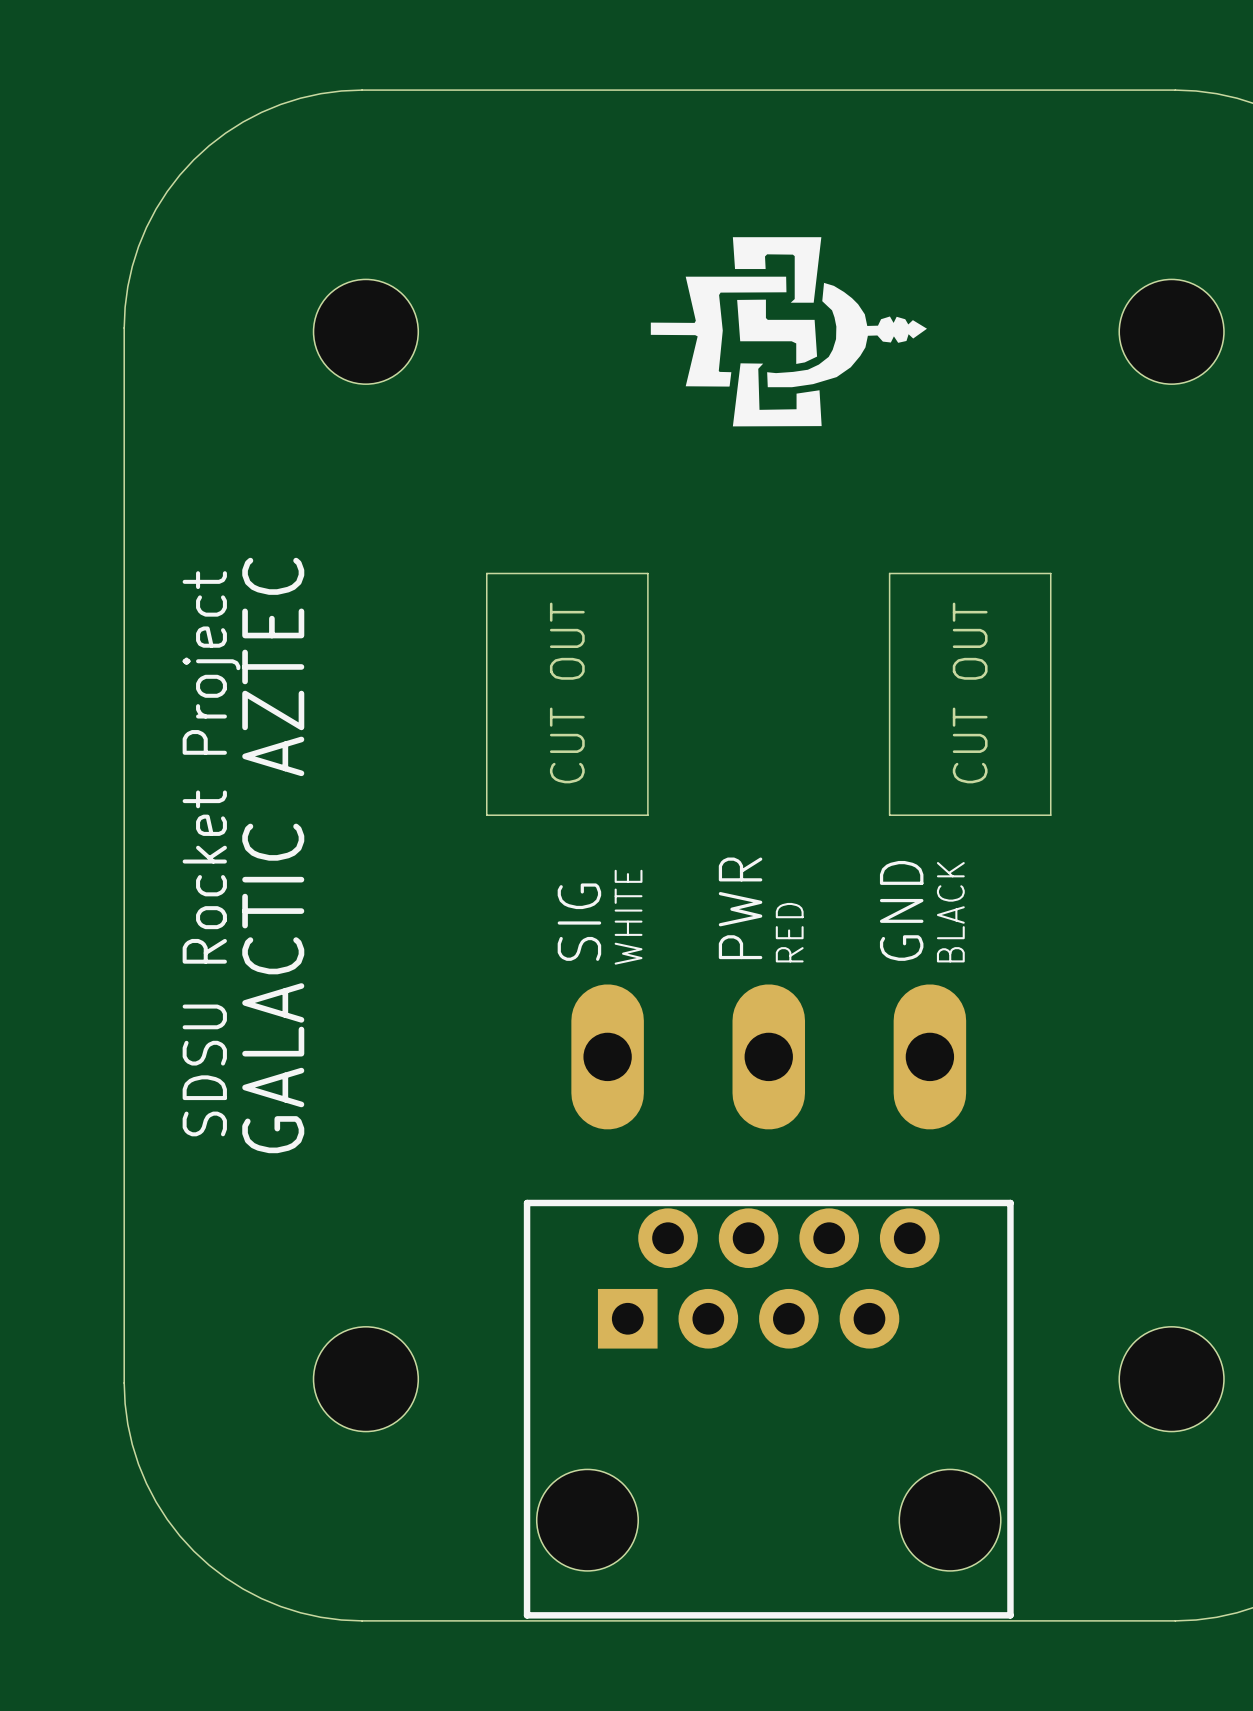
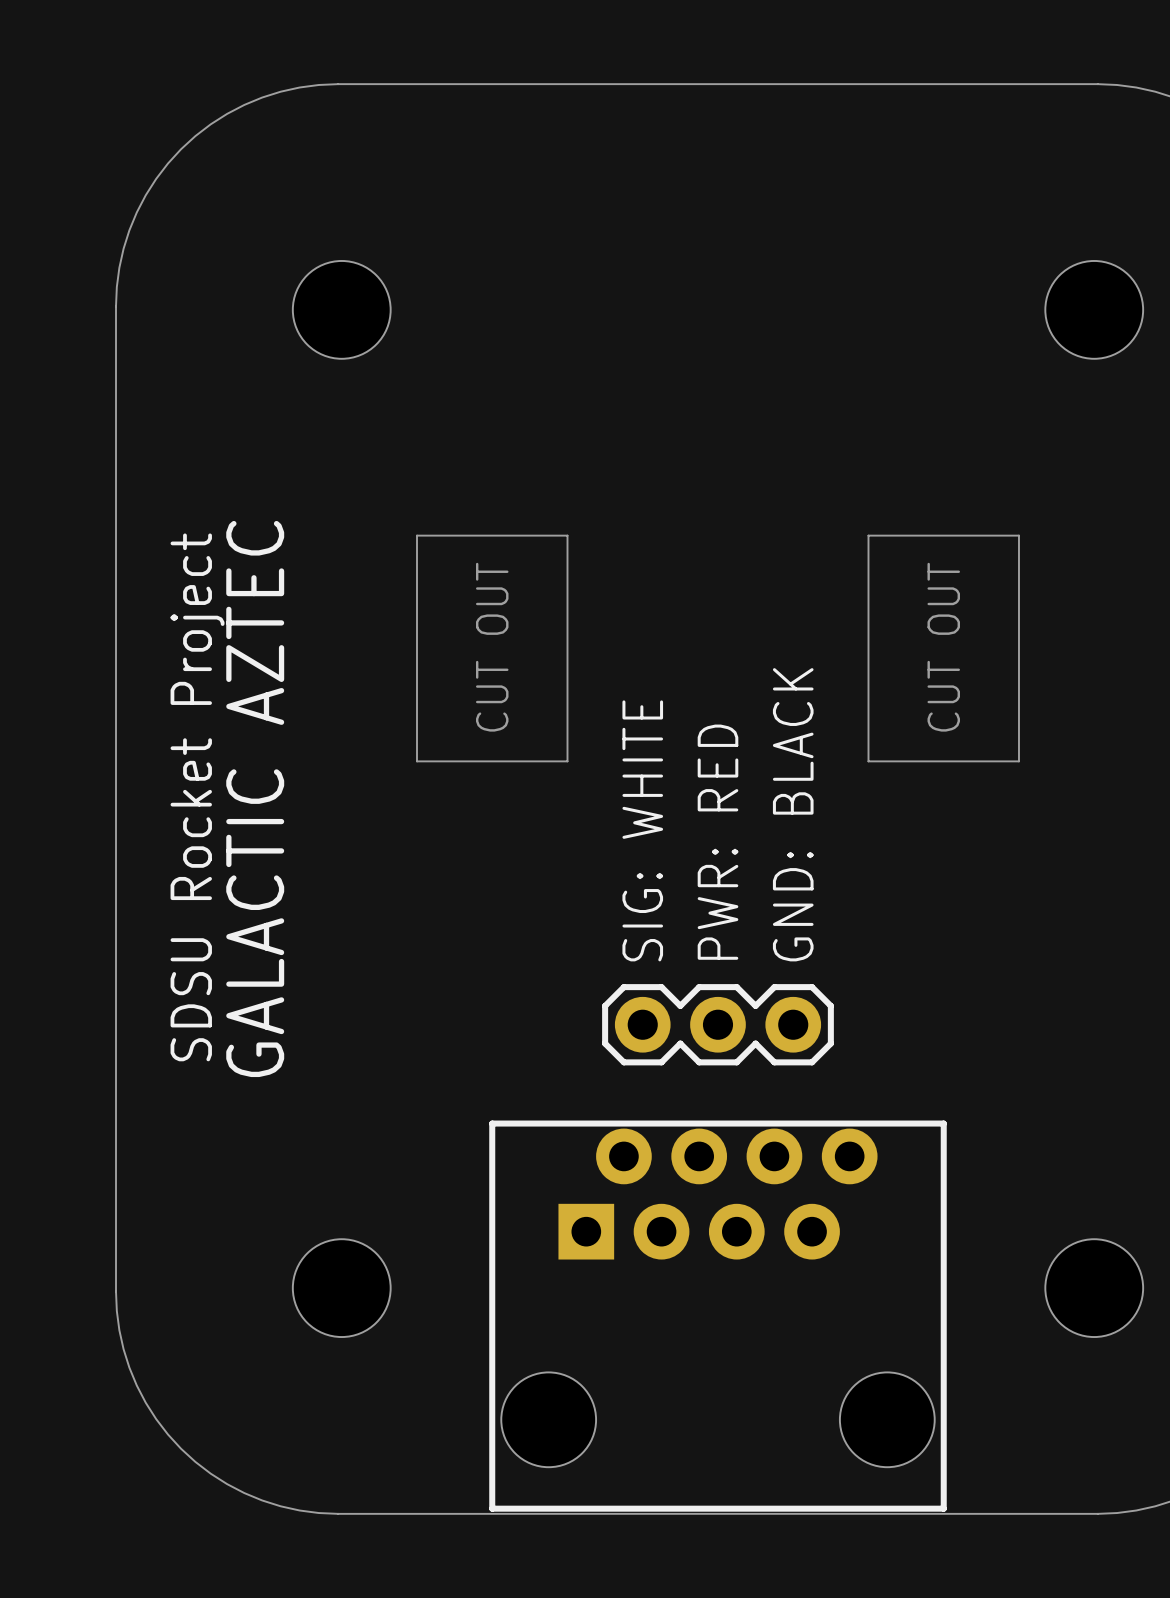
drawing: [650, 237, 927, 427] -> none
board edge: (486, 573) (486, 815) -> (454, 535) (416, 535) (416, 761) (454, 761)
board edge: (607, 573) (647, 573) (647, 815) (607, 815) -> (567, 535) (567, 761)
board edge: (929, 573) (889, 573) (889, 815) (929, 815) -> (868, 535) (868, 761)
board edge: (1050, 573) (1050, 815) -> (981, 535) (1018, 535) (1018, 761) (981, 761)
text position: CUT OUT (567, 692) -> CUT OUT (492, 647)
text position: CUT OUT (970, 692) -> CUT OUT (943, 647)
text: none -> GND: BLACK (793, 814)
text: none -> SIG: WHITE (642, 830)
text: none -> PWR: RED (717, 842)
part: (768, 1056) -> none
part: none -> (717, 1024)

